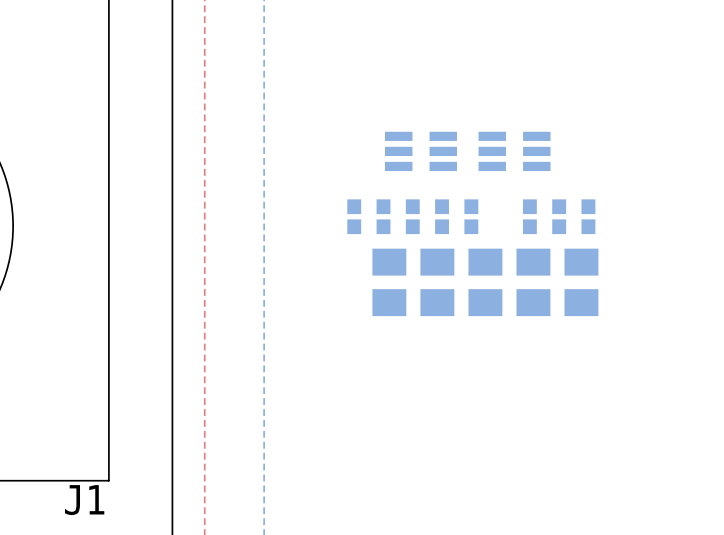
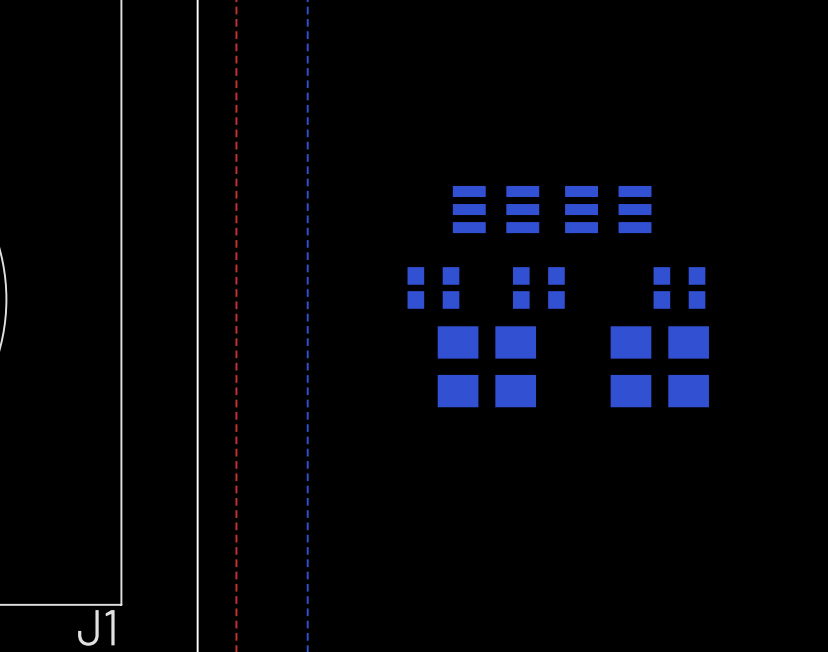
part: (412, 216) -> none
part: (529, 216) -> none
part: (485, 282) -> none

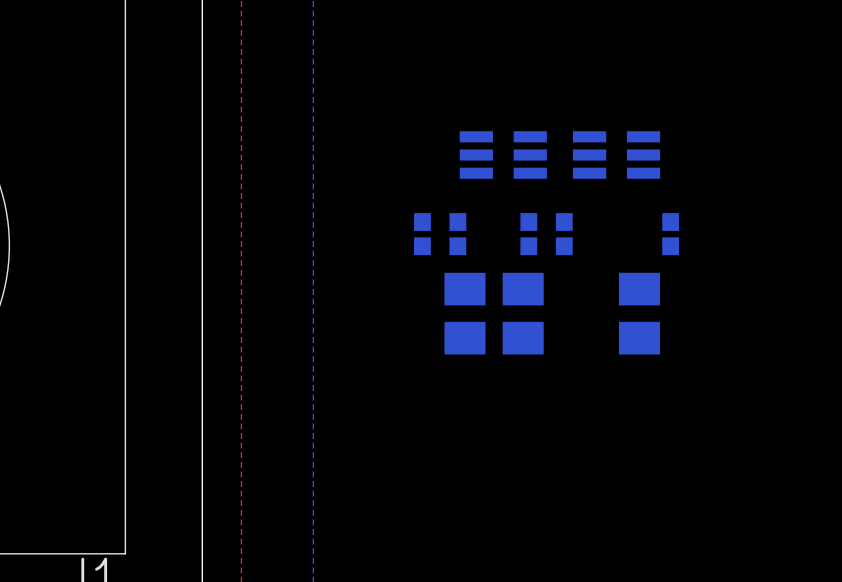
part: (697, 287) -> none
part: (688, 366) -> none

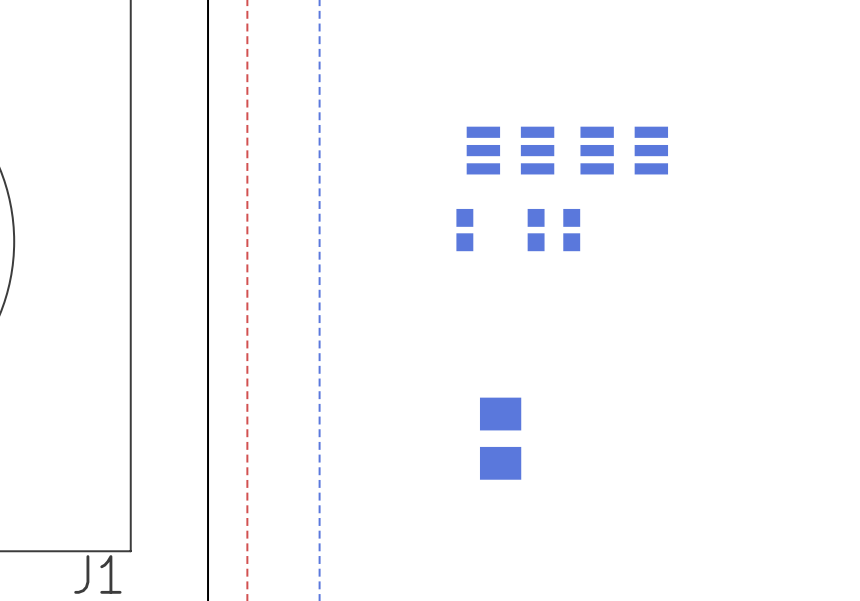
part: (422, 234) -> none
part: (670, 234) -> none
part: (465, 313) -> none
part: (523, 313) -> none
part: (639, 313) -> none
part: none -> (500, 438)

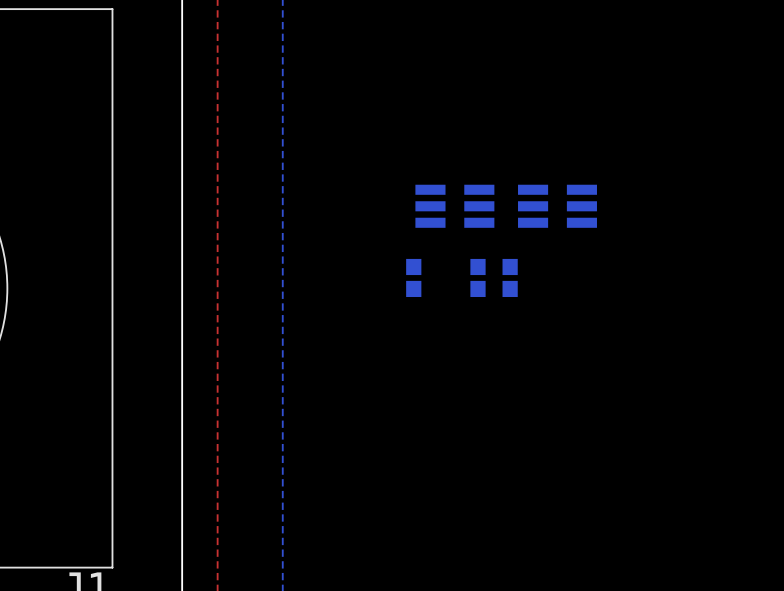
part: (500, 438) -> none

